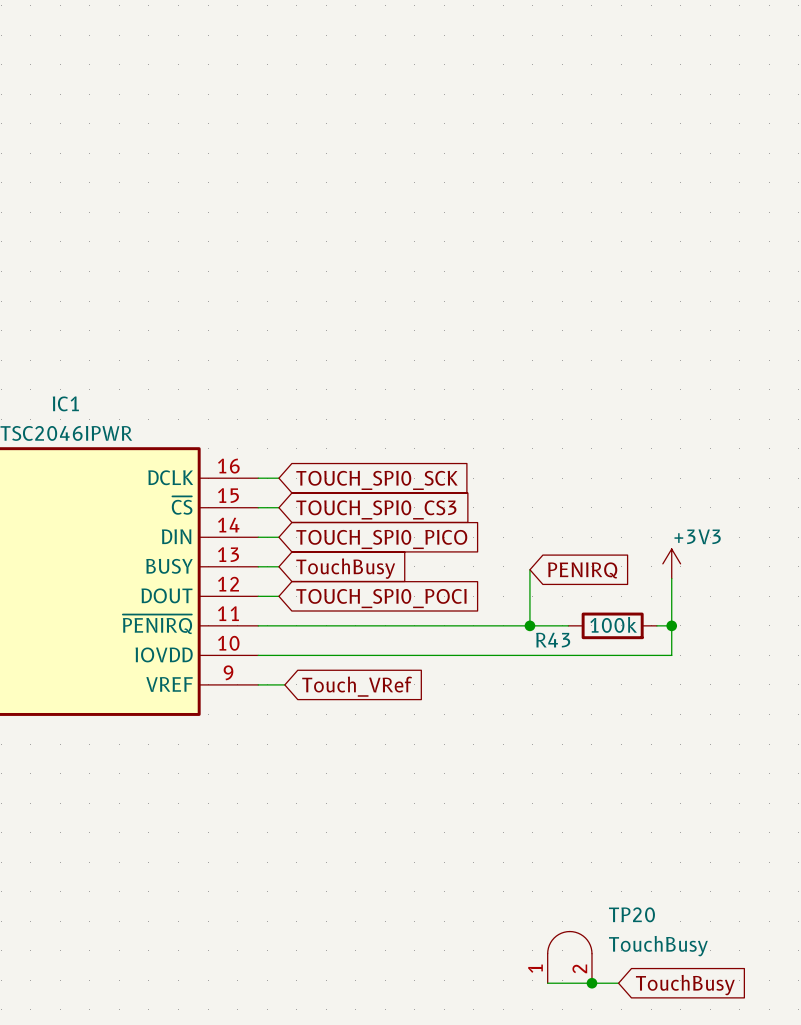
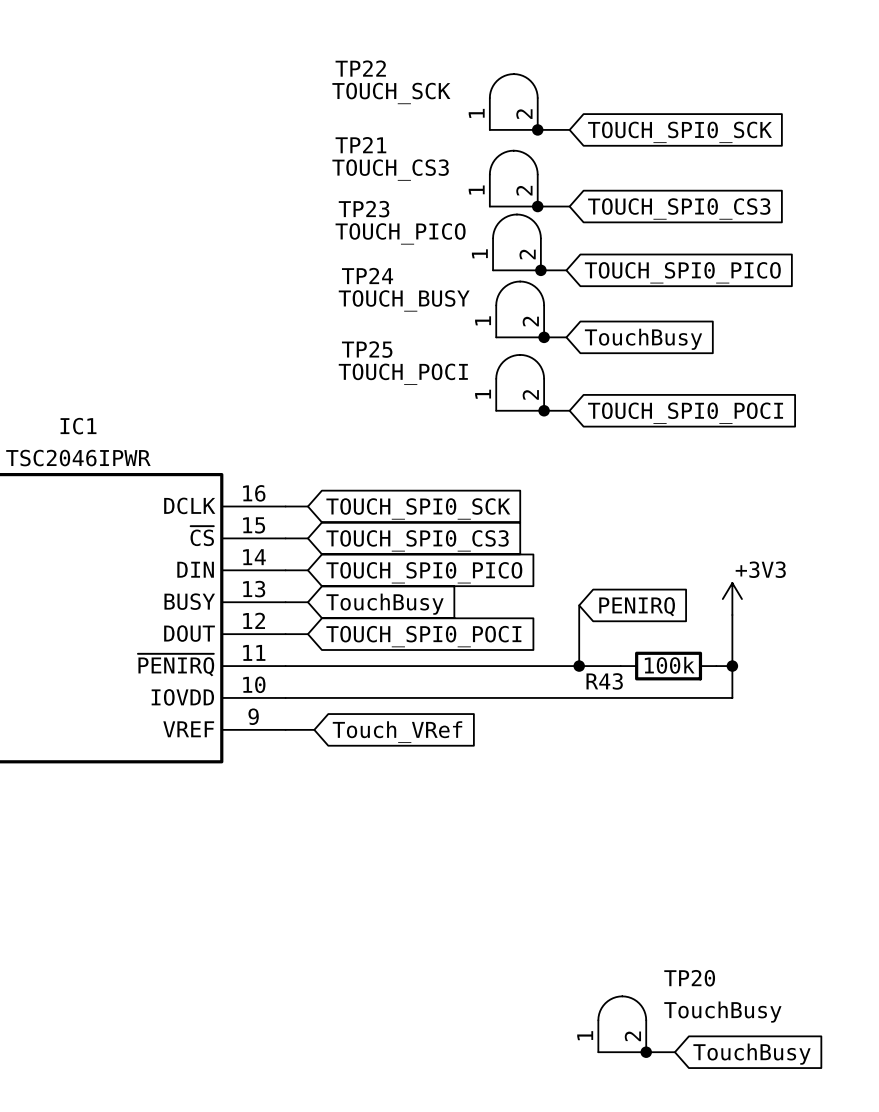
TP22: none -> TOUCH_SCK (513, 102)
wire: none -> (489, 129) (569, 129)
junction: none -> (537, 129)
global label: none -> TOUCH_SPI0_SCK (680, 132)
TP21: none -> TOUCH_CS3 (513, 178)
wire: none -> (489, 206) (569, 206)
junction: none -> (537, 206)
global label: none -> TOUCH_SPI0_CS3 (679, 208)
TP23: none -> TOUCH_PICO (516, 242)
wire: none -> (493, 270) (566, 270)
junction: none -> (540, 270)
global label: none -> TOUCH_SPI0_PICO (682, 272)
TP24: none -> TOUCH_BUSY (520, 309)
wire: none -> (496, 337) (566, 337)
junction: none -> (544, 337)
global label: none -> TouchBusy (643, 339)
TP25: none -> TOUCH_POCI (520, 382)
wire: none -> (496, 410) (569, 410)
junction: none -> (544, 410)
global label: none -> TOUCH_SPI0_POCI (685, 413)

